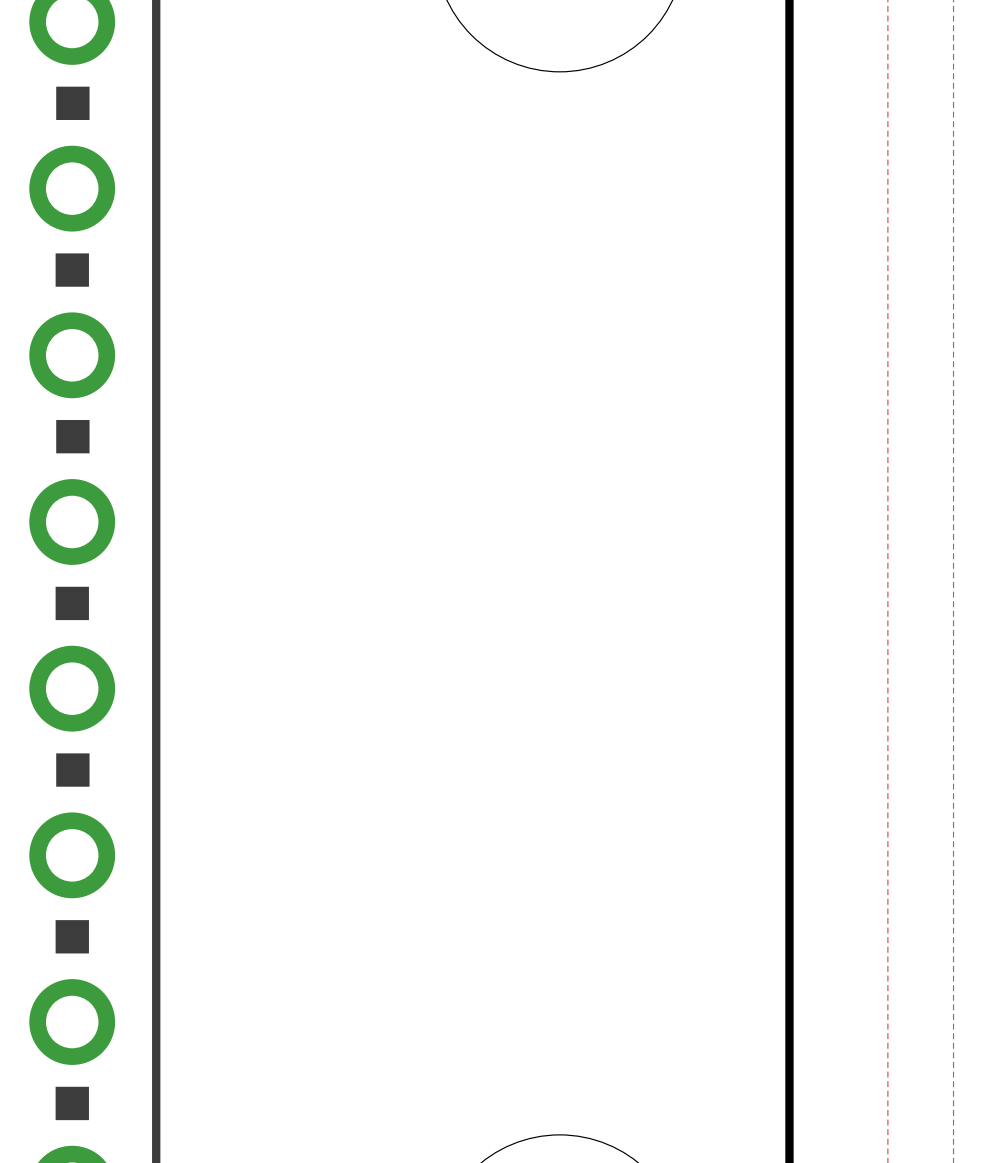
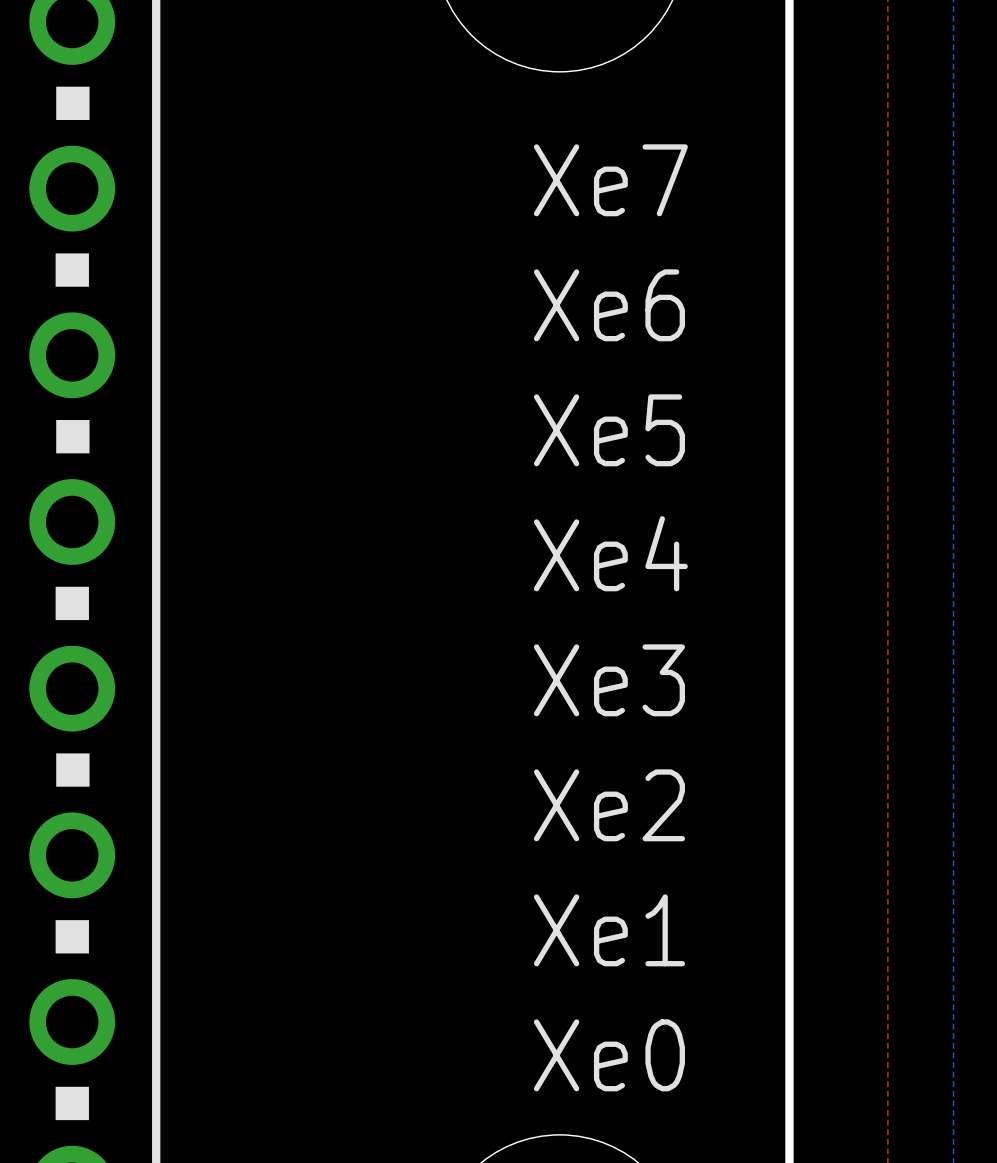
text: none -> Xe7 (610, 180)
text: none -> Xe6 (609, 305)
text: none -> Xe5 (609, 430)
text: none -> Xe4 (610, 553)
text: none -> Xe3 (609, 680)
text: none -> Xe2 (609, 805)
text: none -> Xe1 (609, 930)
text: none -> Xe0 (609, 1055)

